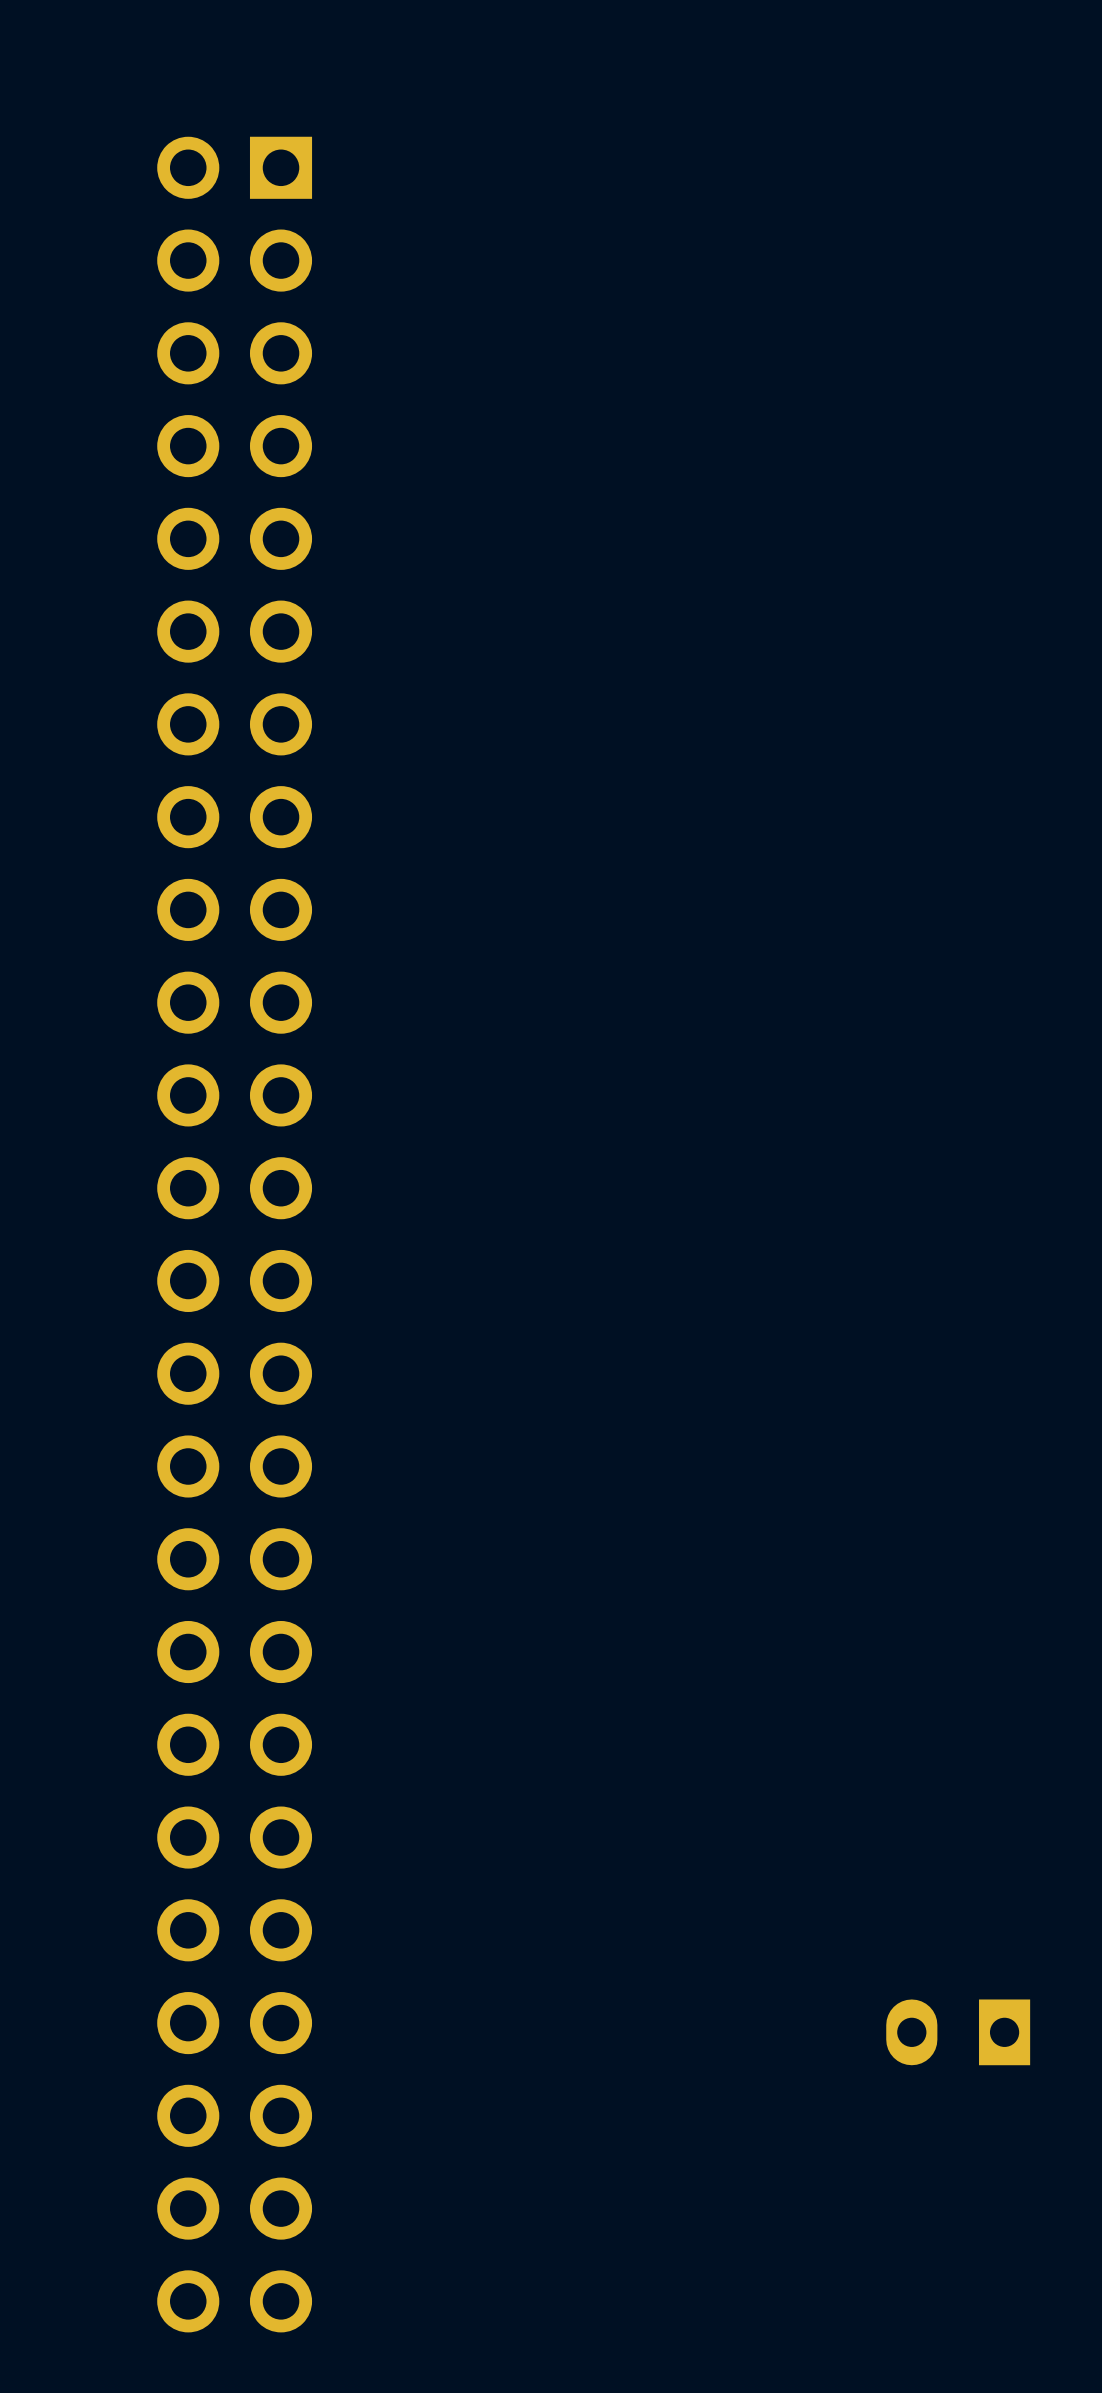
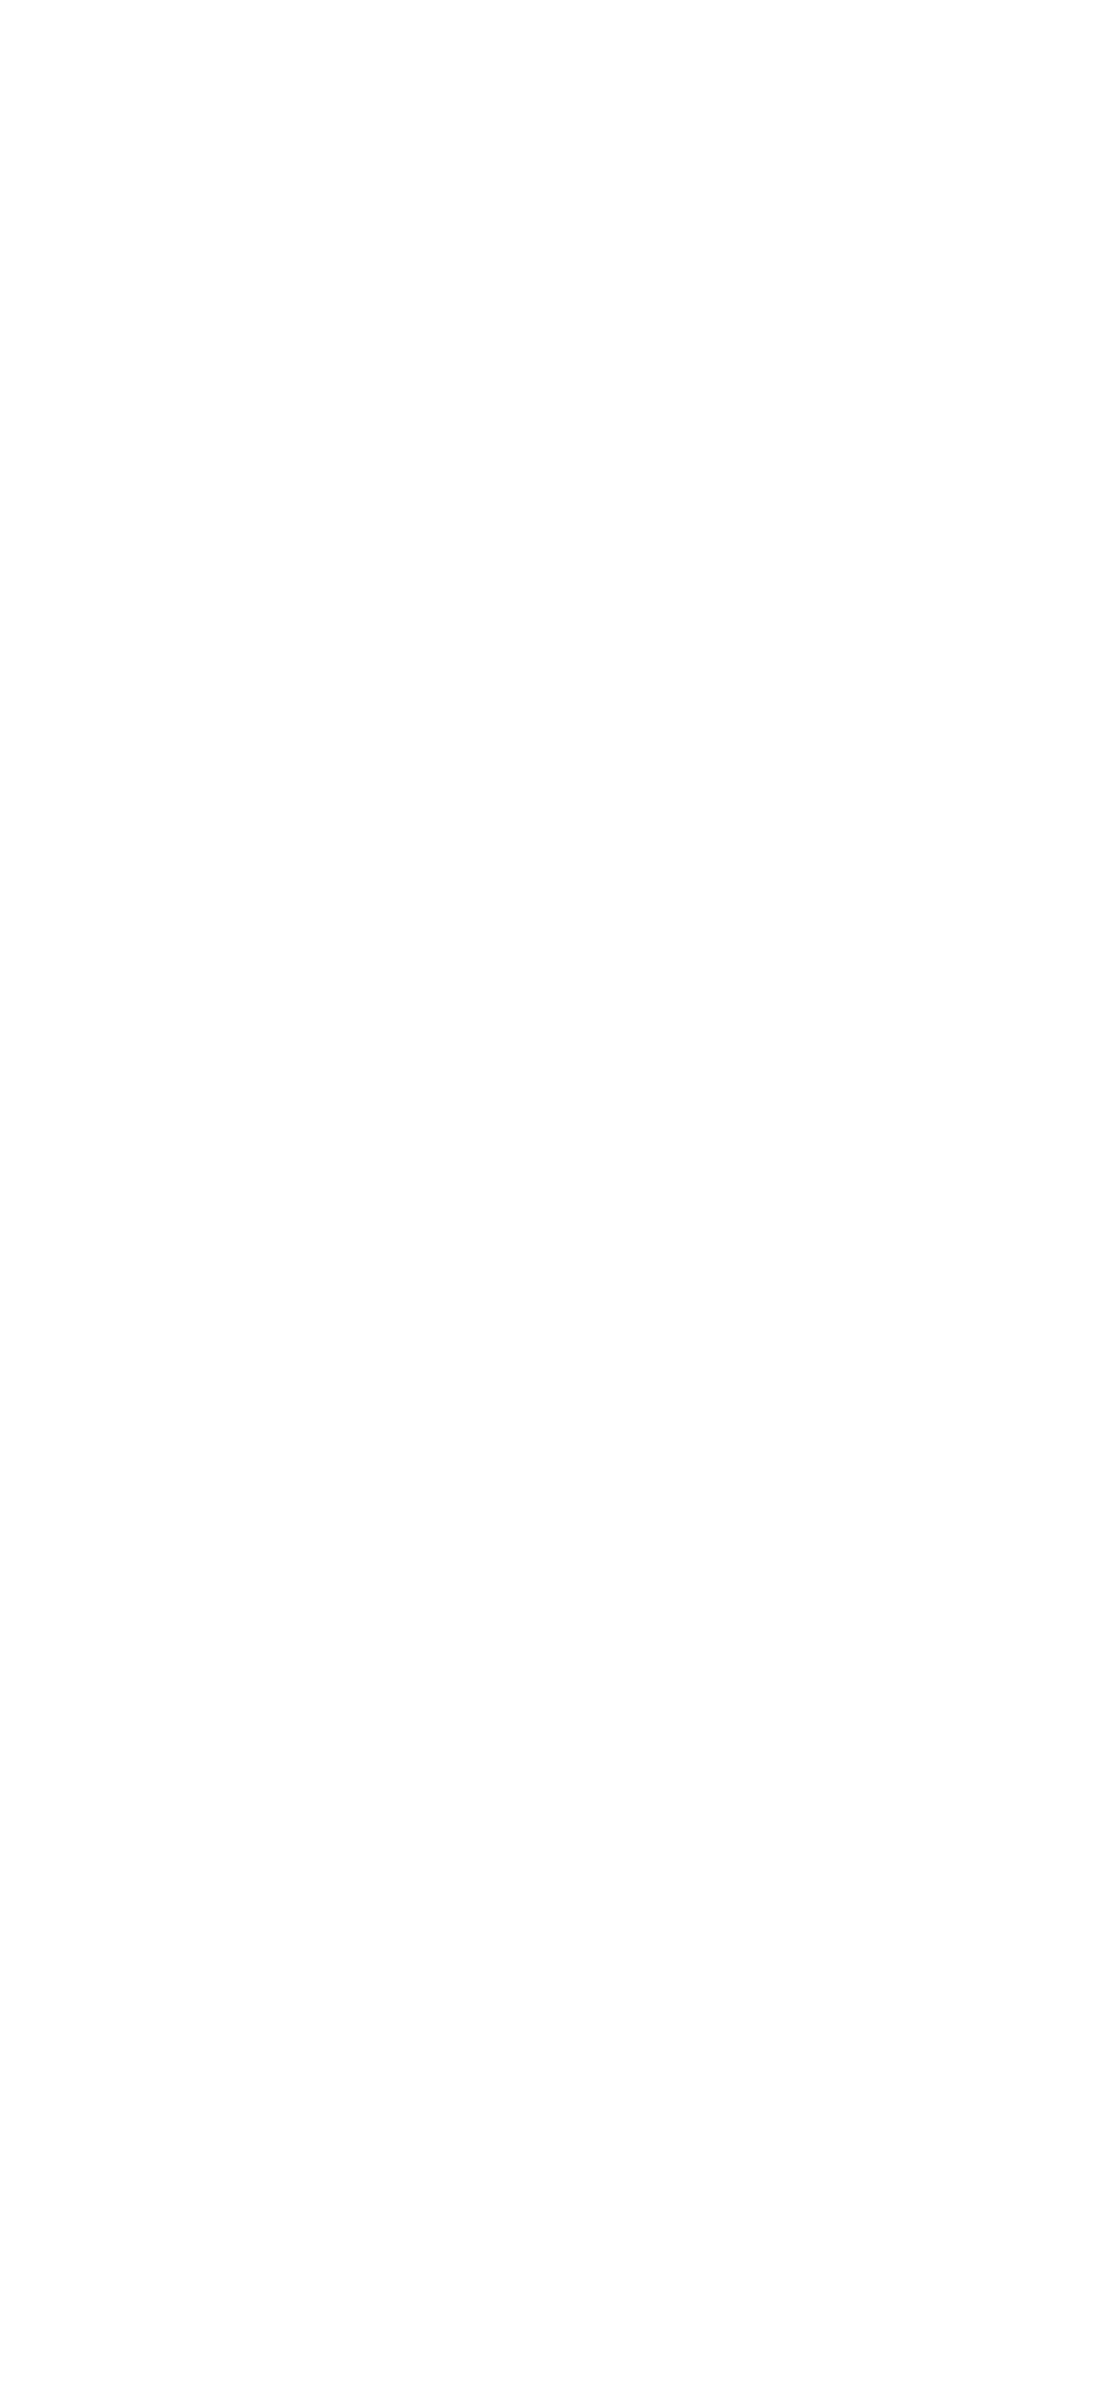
part: (234, 1234) -> none
part: (958, 2032) -> none

